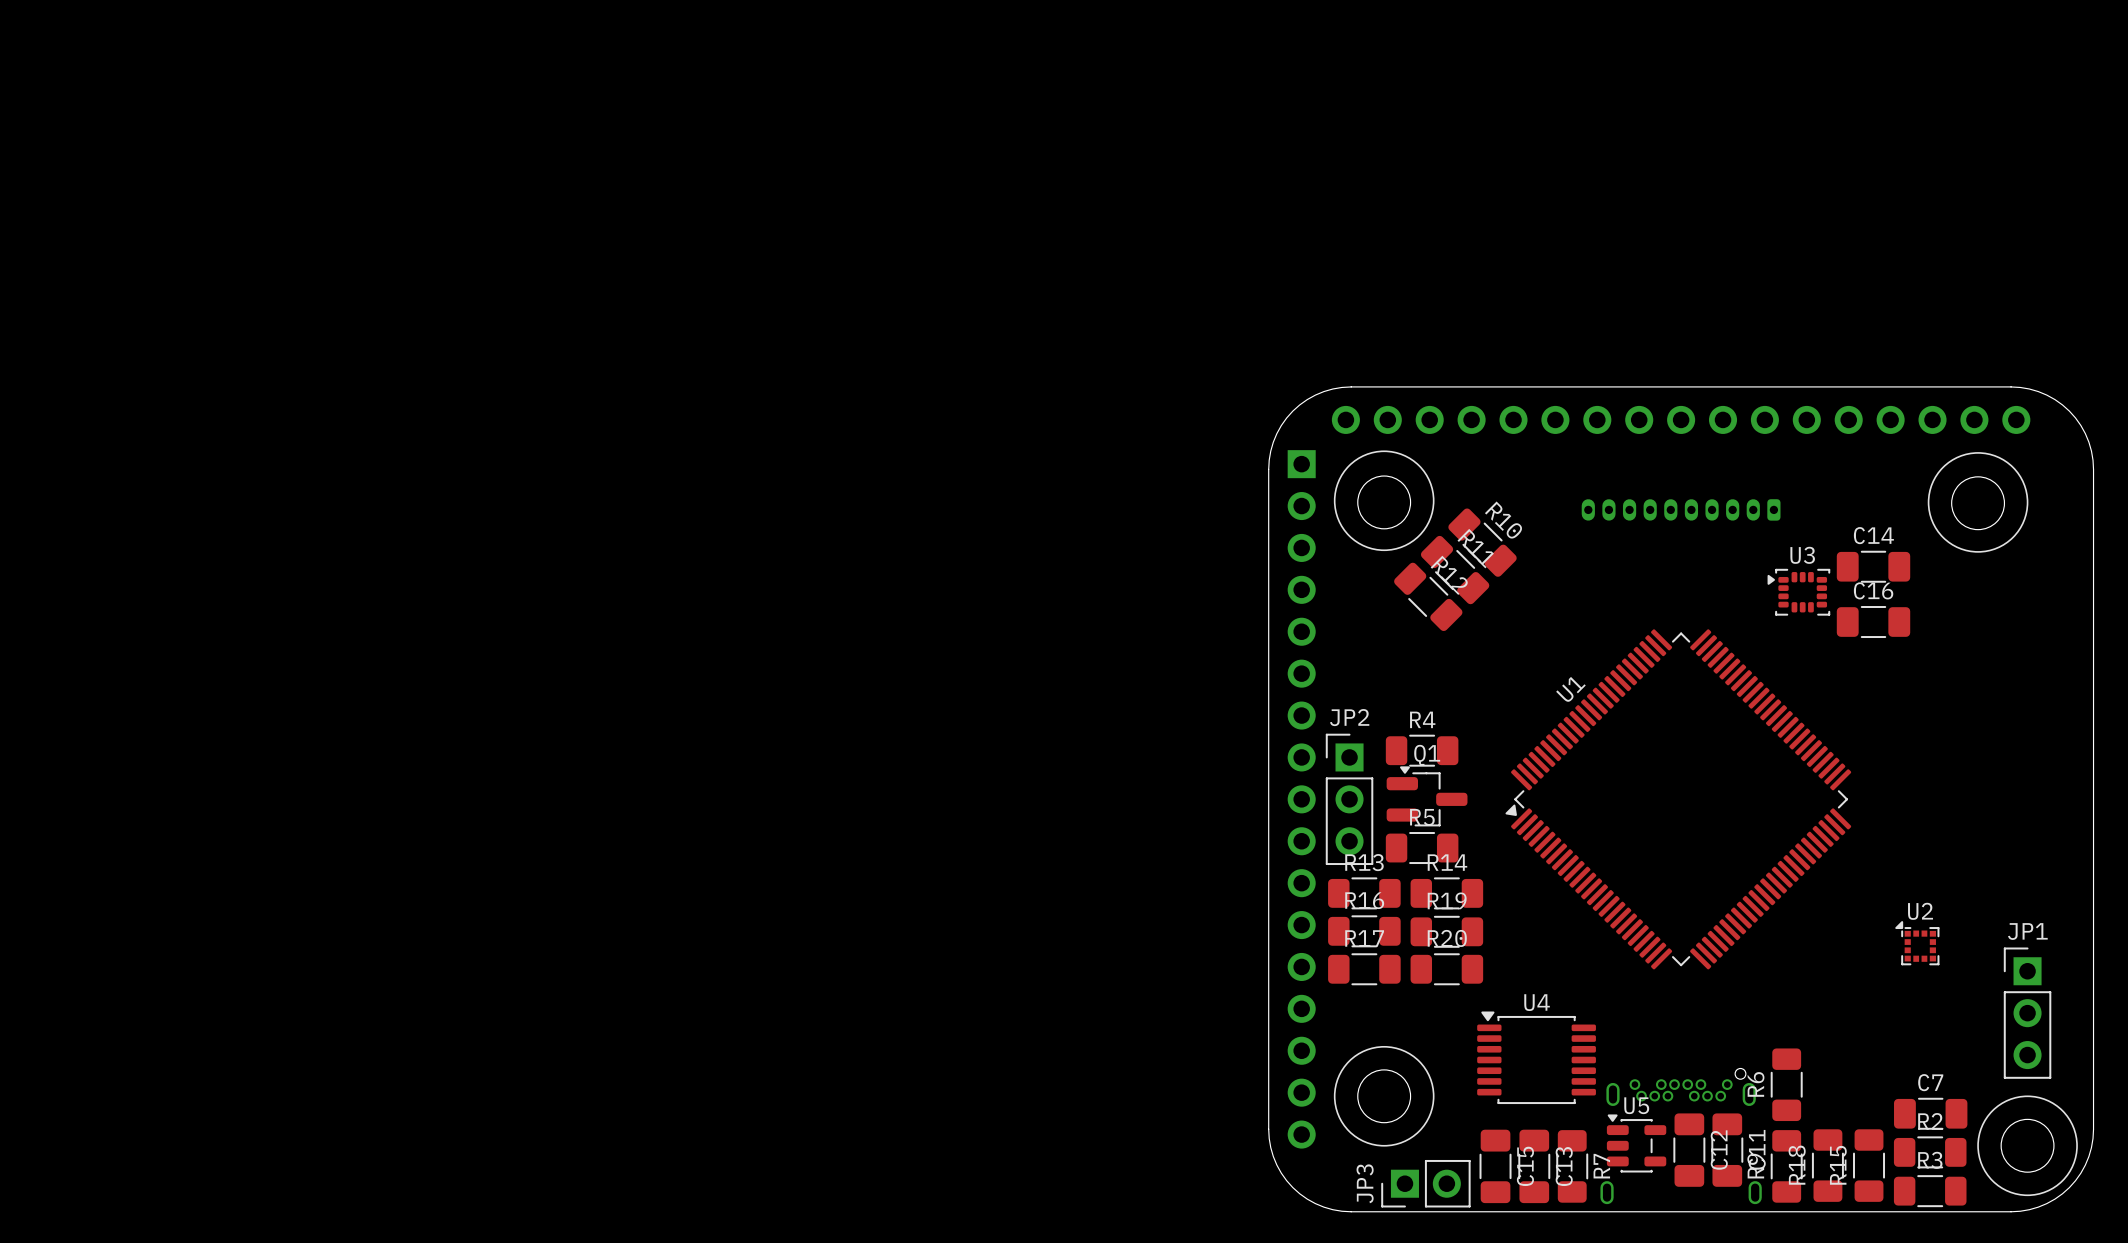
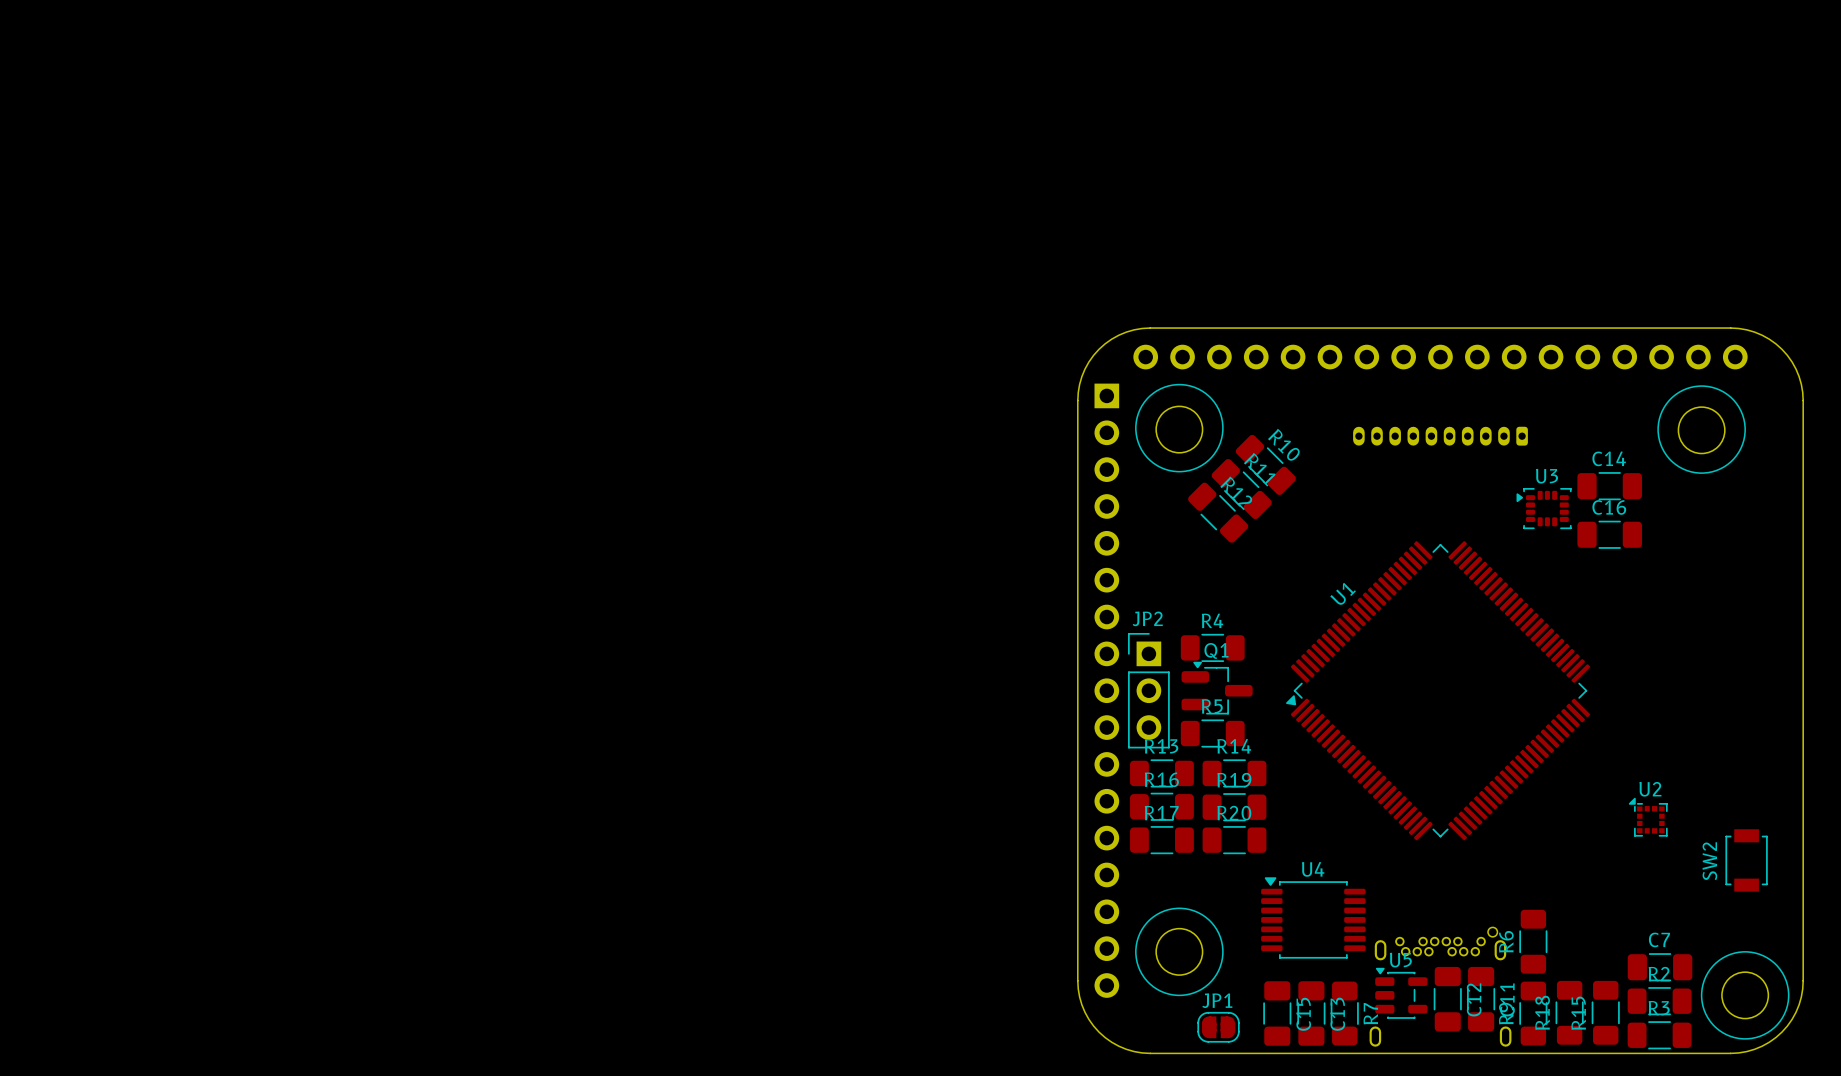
JP1 name position: JP1 (2027, 931) -> JP1 (1217, 1000)
JP1 footprint: [2003, 947, 2052, 1079] -> [1197, 1011, 1240, 1043]
SW2: none -> (1746, 860)
JP3: (1425, 1183) -> none

